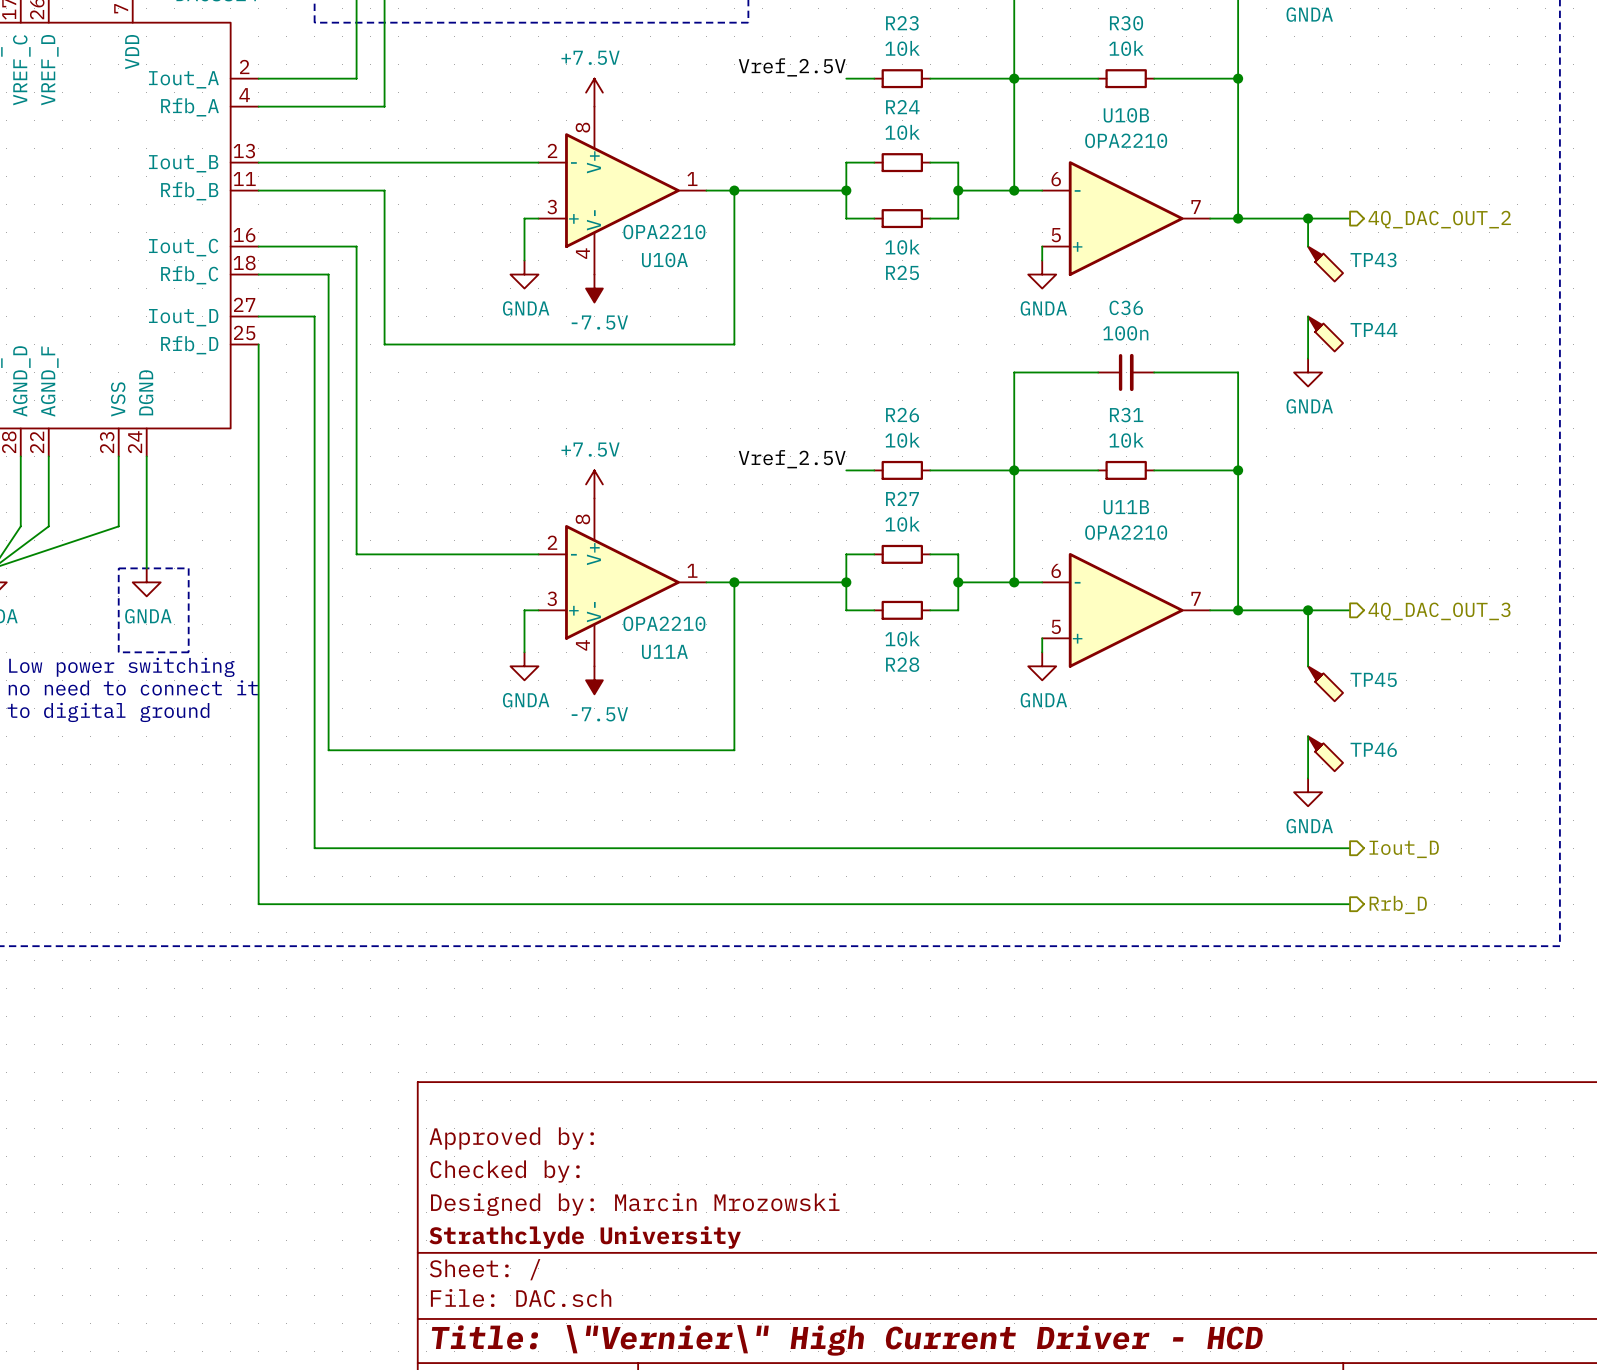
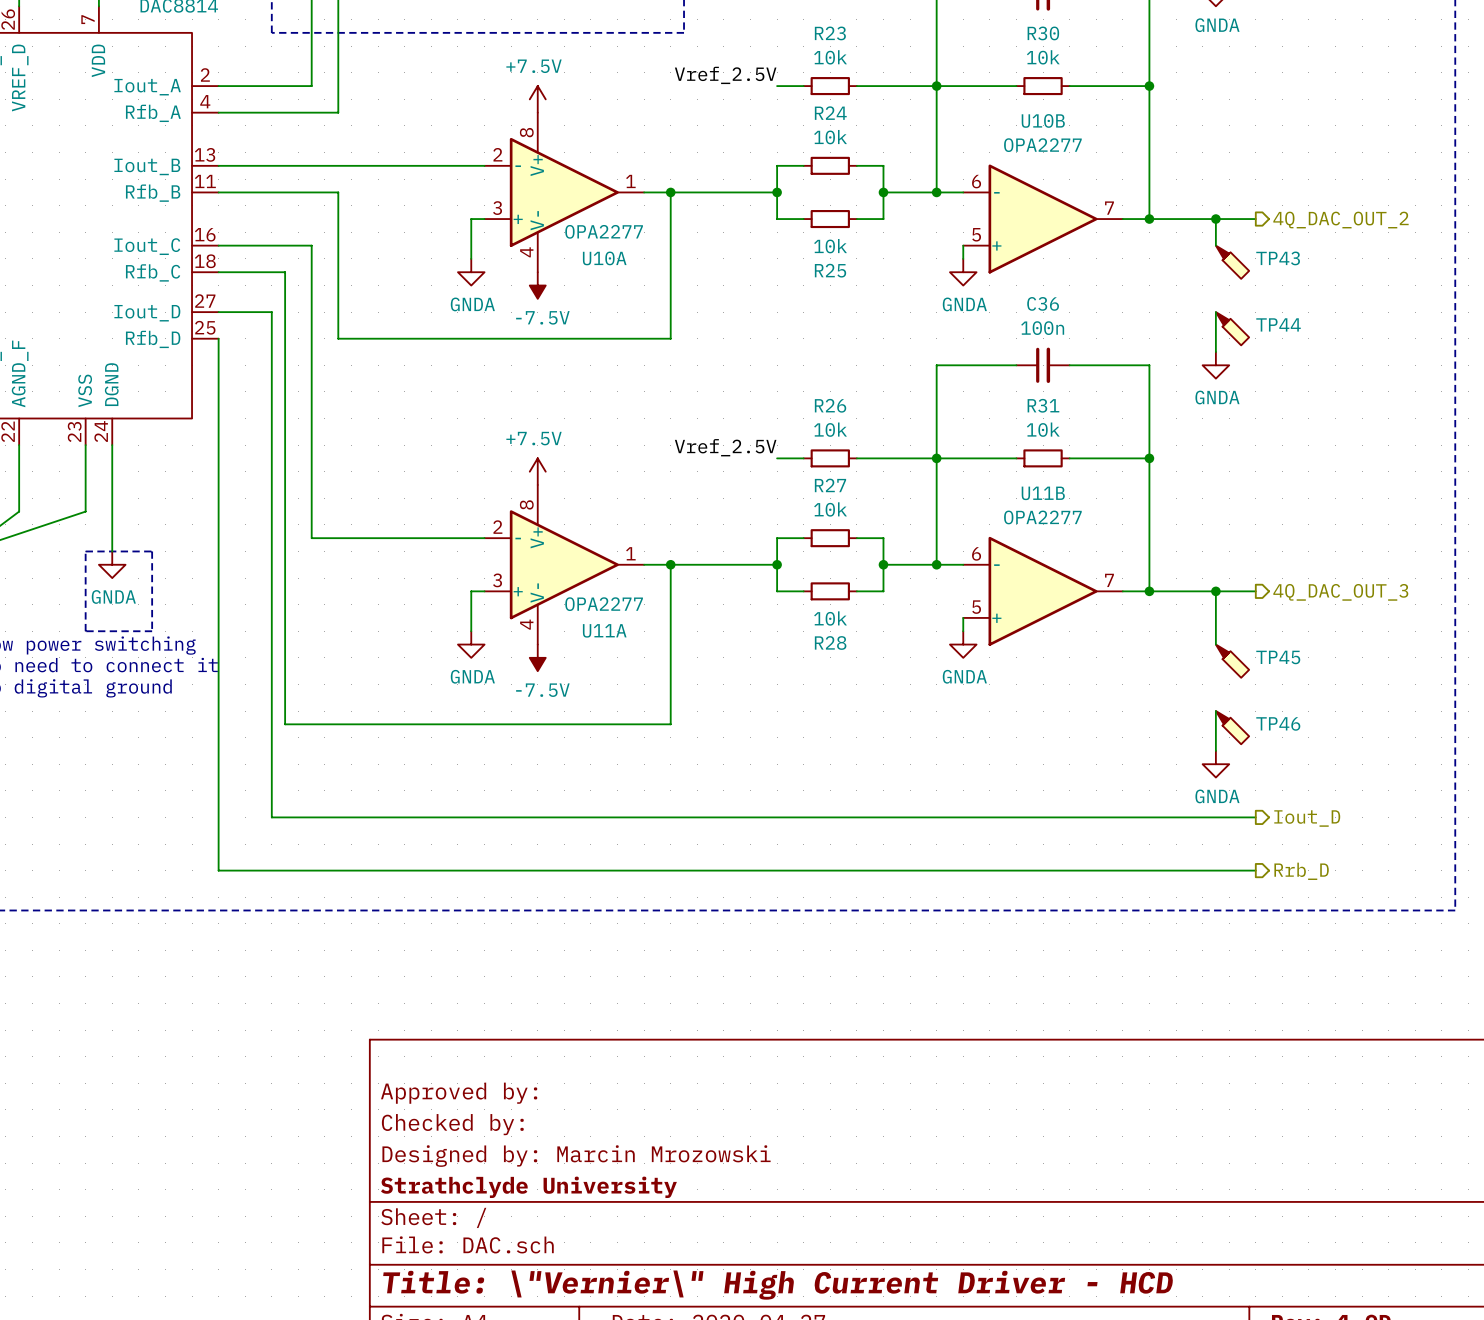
U10B value: OPA2210 (1126, 140) -> OPA2277 (1042, 145)
U10A value: OPA2210 (664, 232) -> OPA2277 (604, 231)
U11B value: OPA2210 (1126, 532) -> OPA2277 (1042, 517)
U11A value: OPA2210 (664, 623) -> OPA2277 (604, 604)

